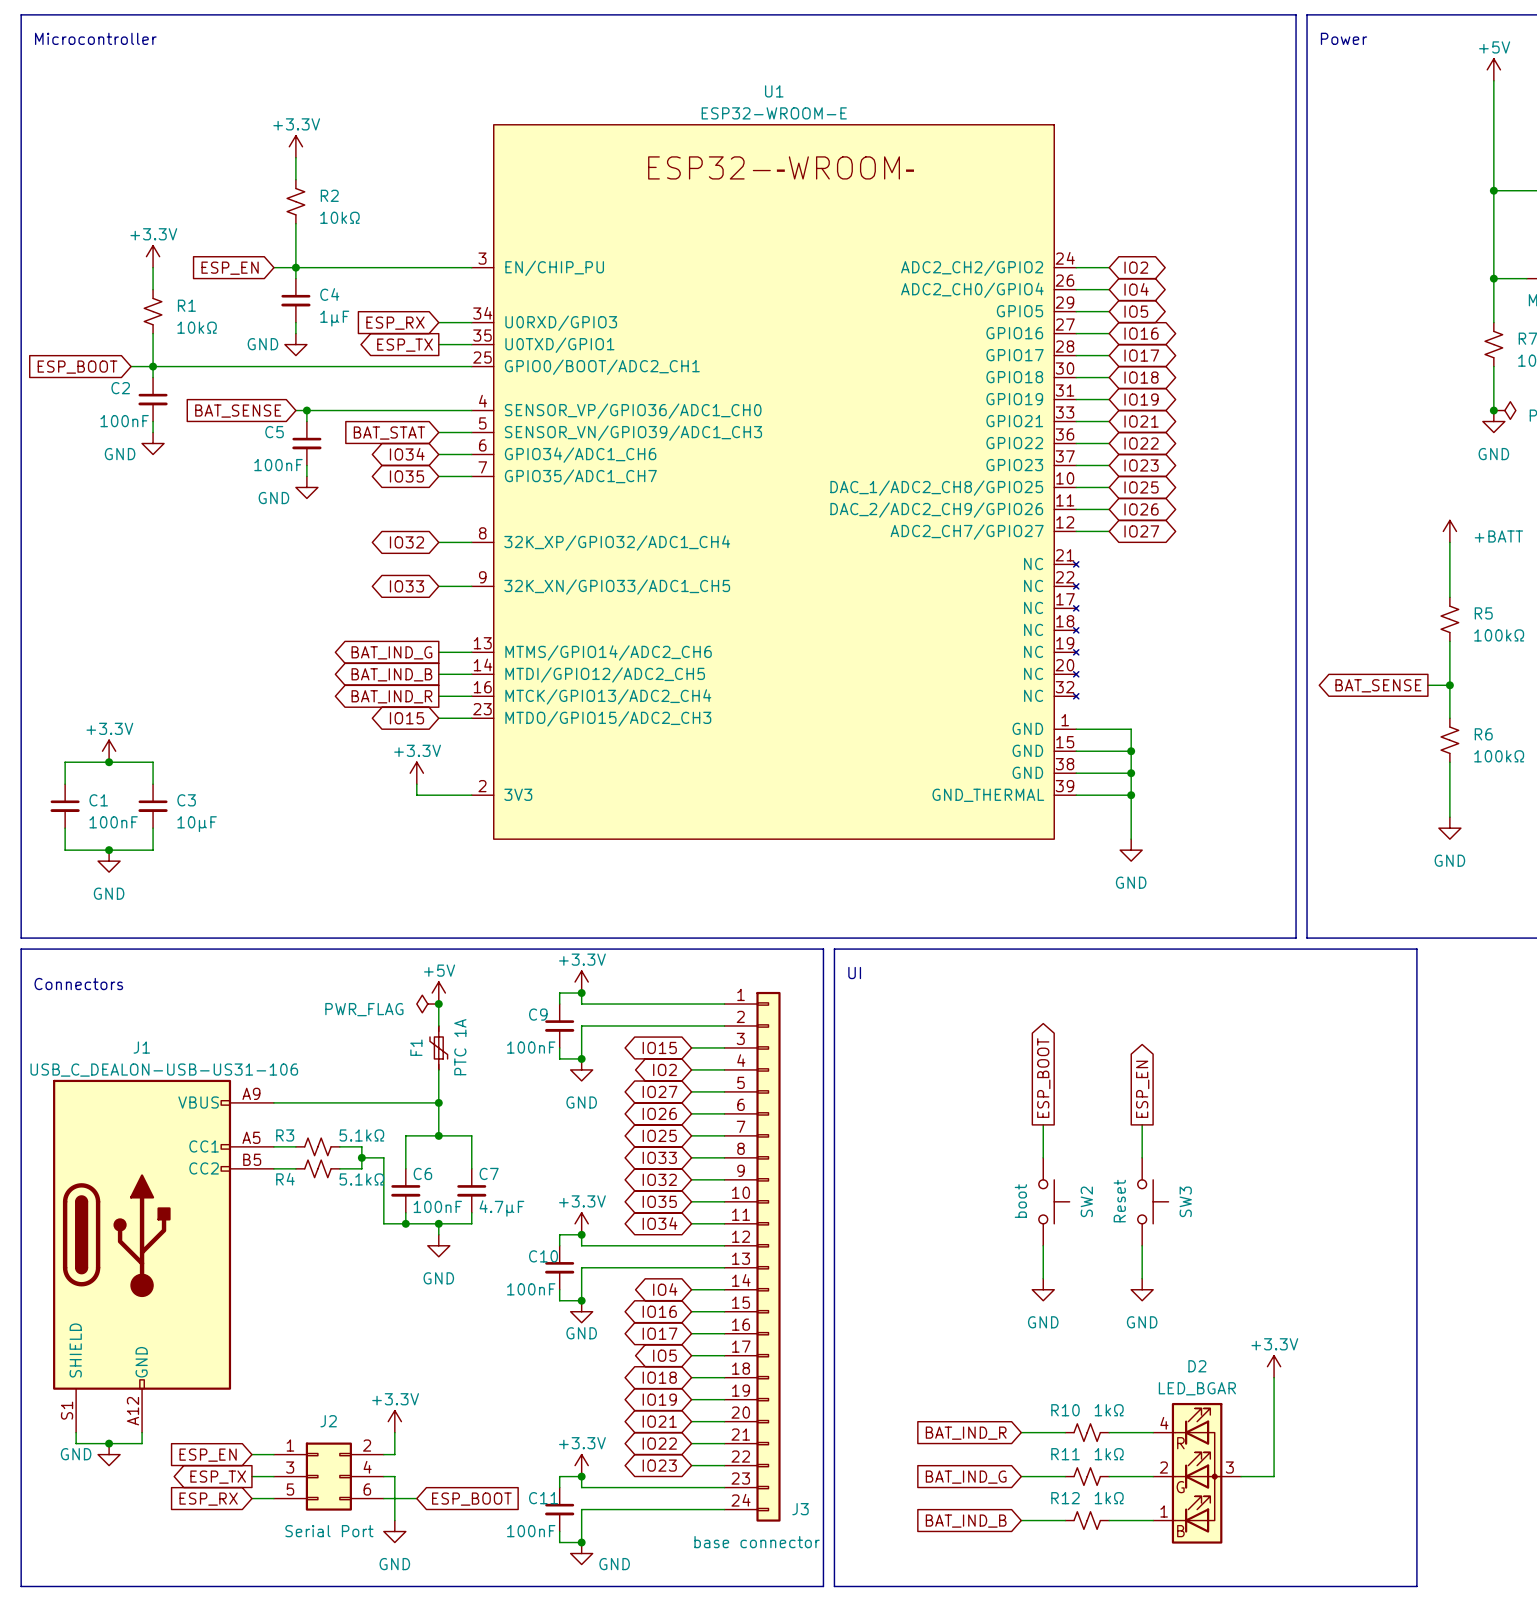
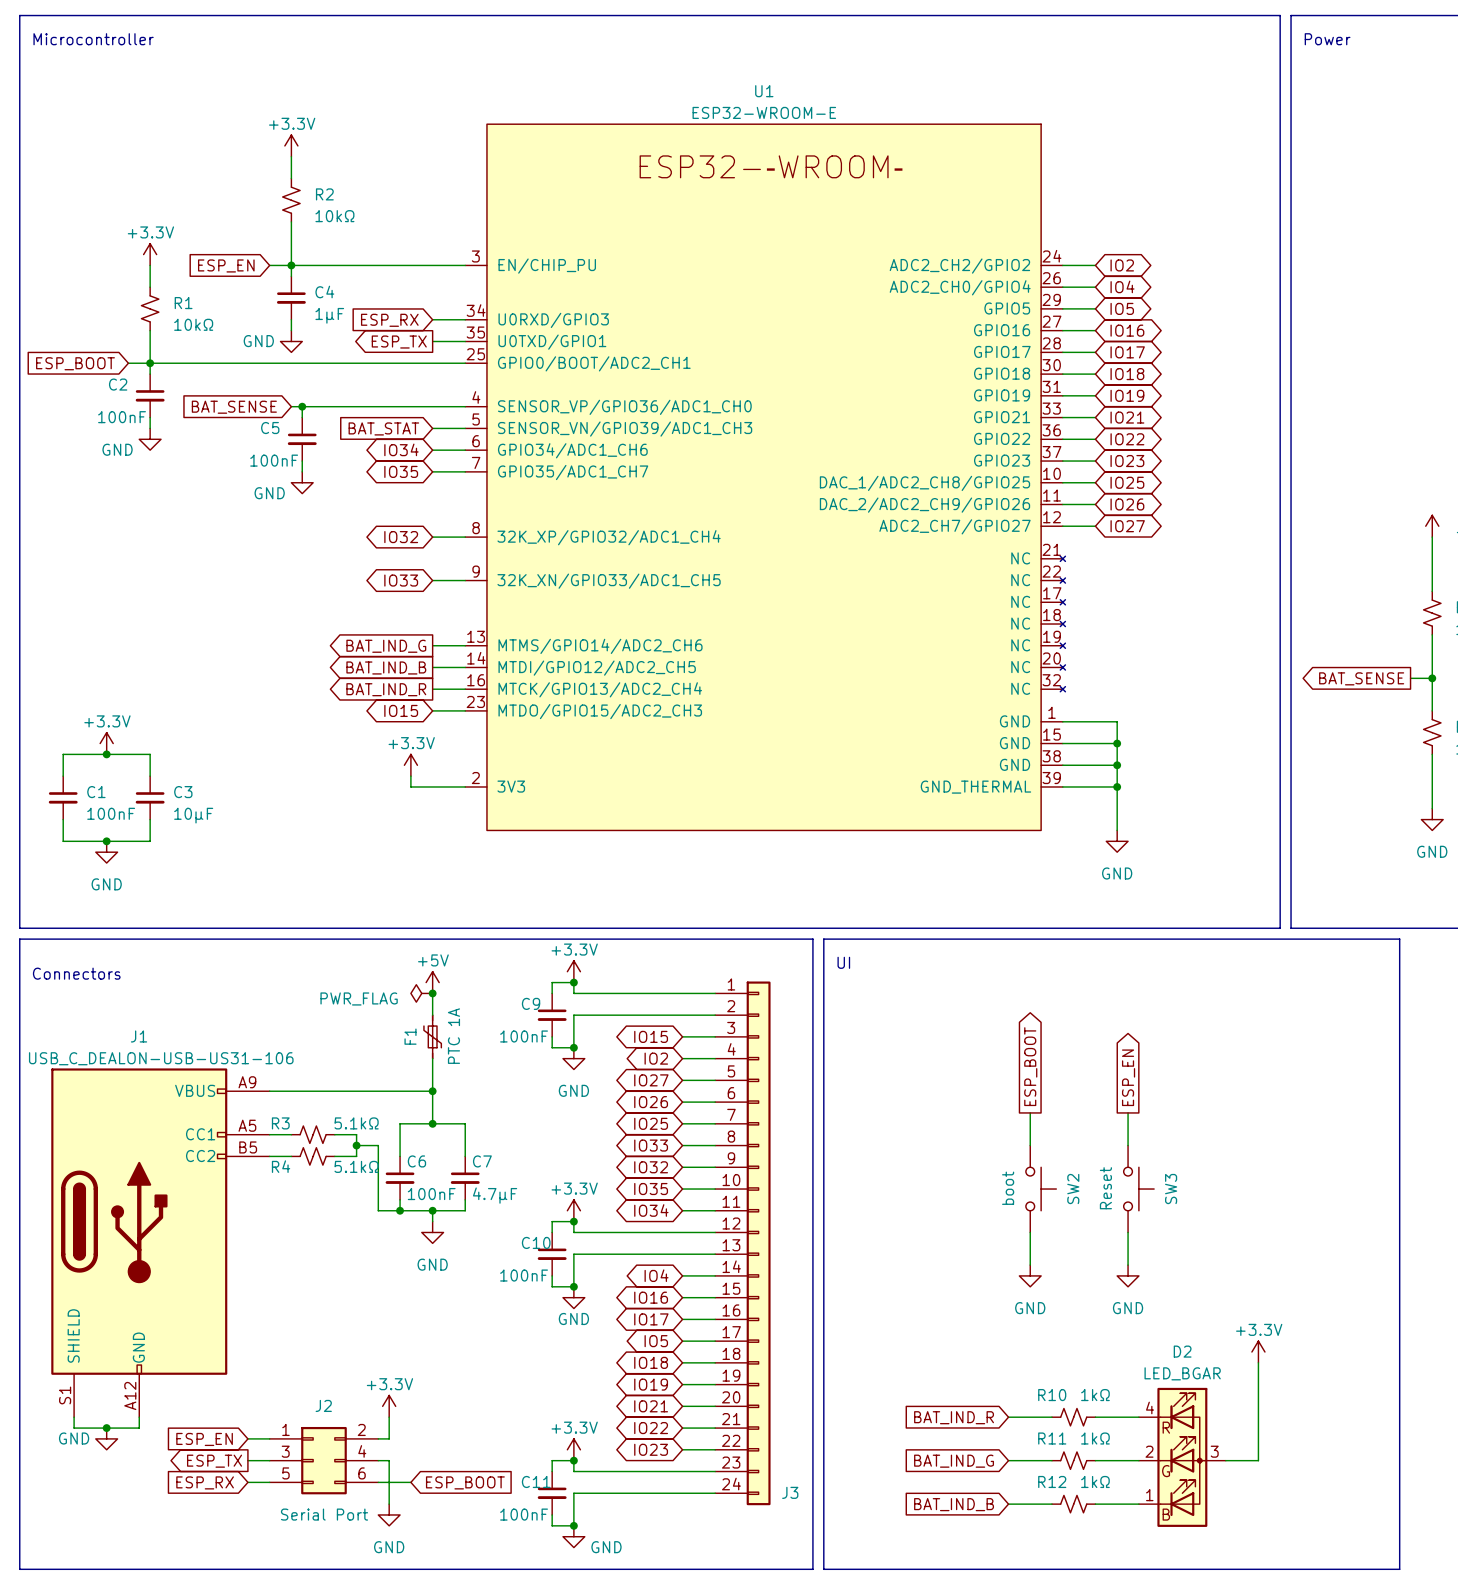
J3 value: base connector (757, 1542) -> none

